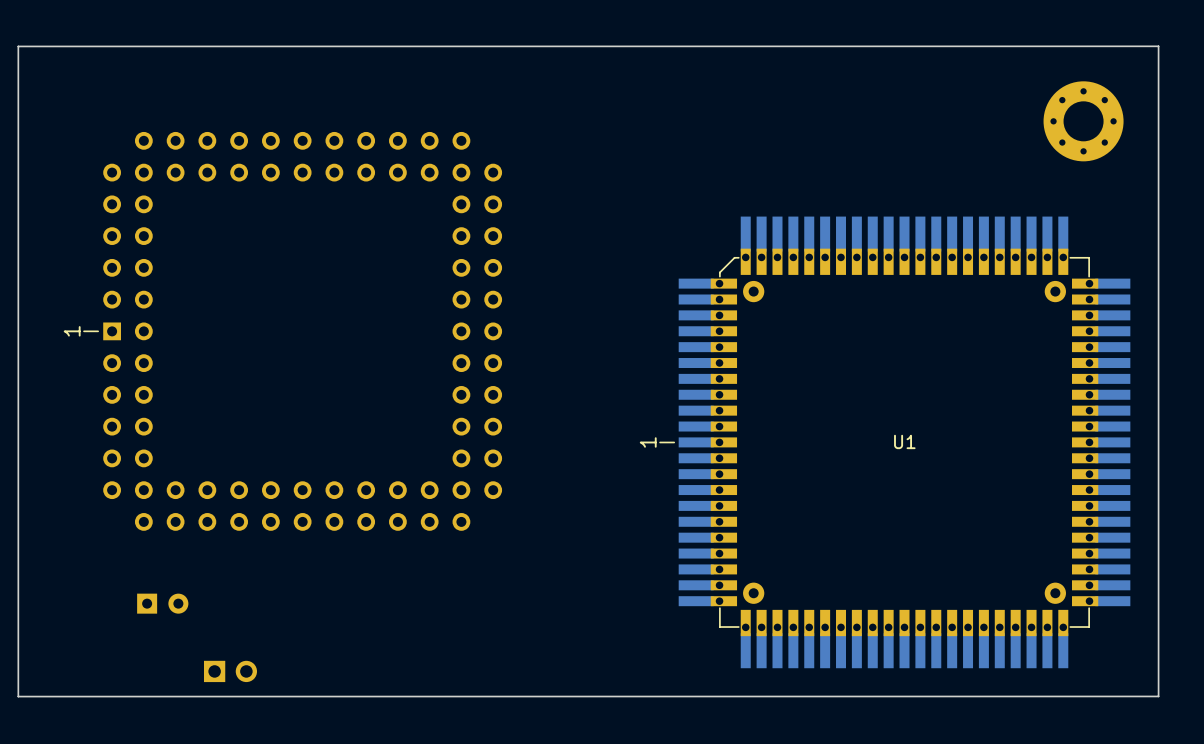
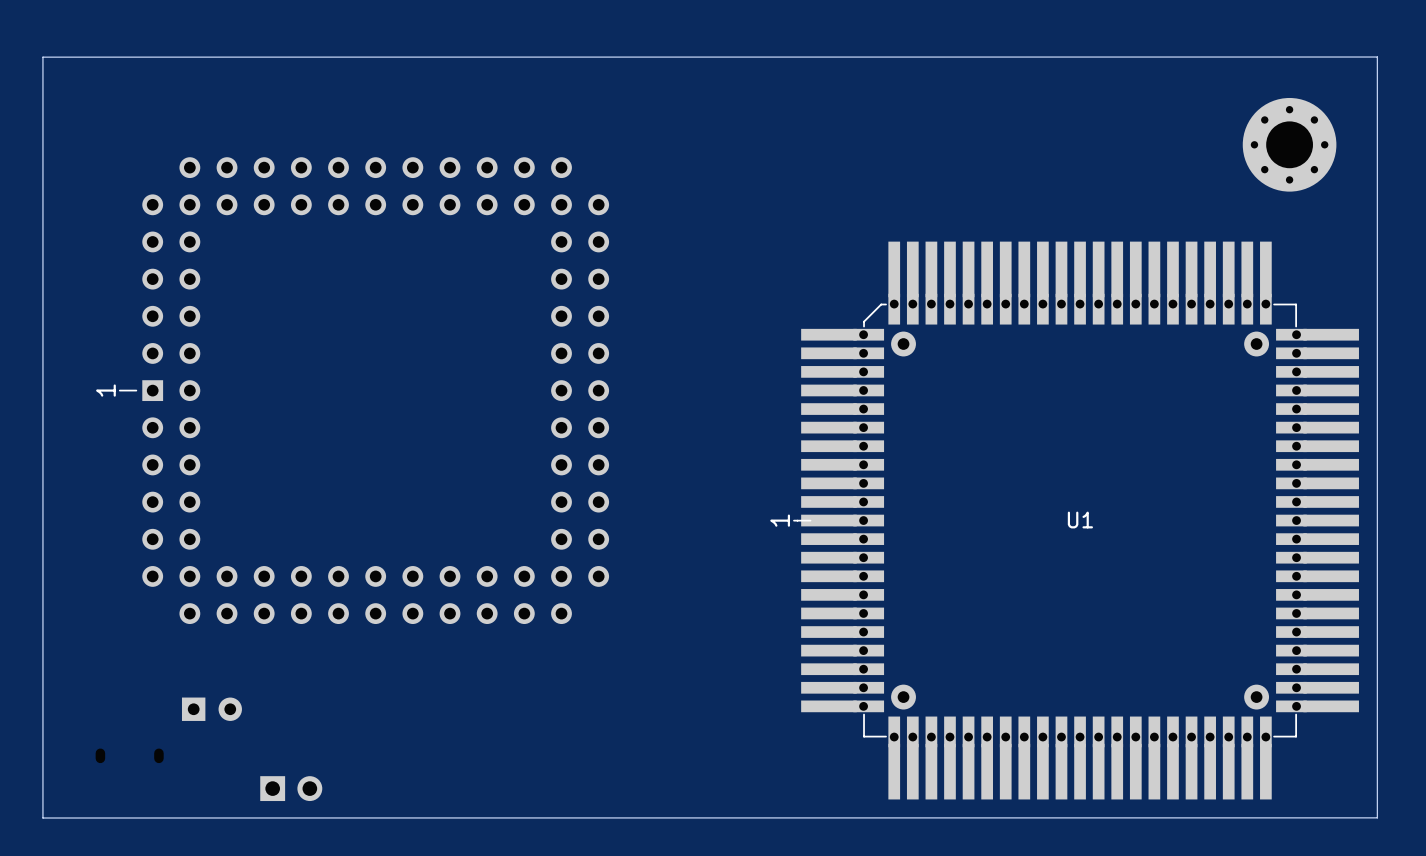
U1 footprint: [678, 216, 1131, 669] -> [801, 241, 1359, 800]

